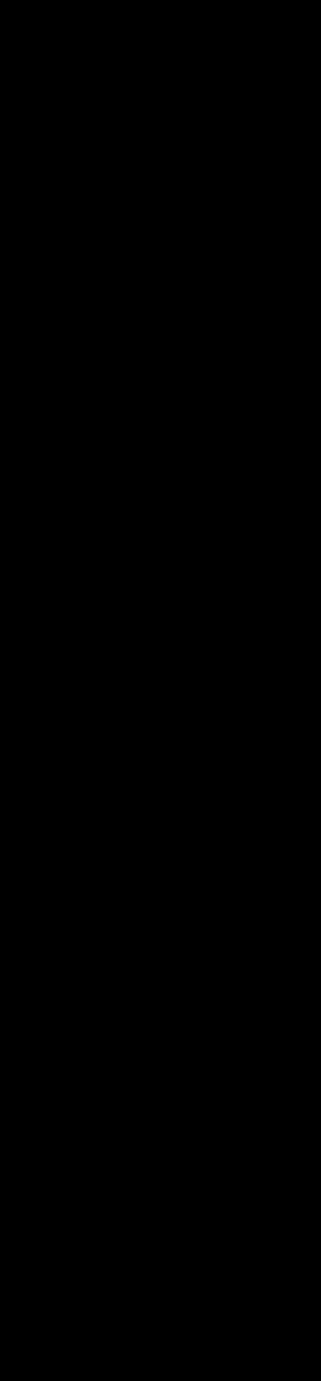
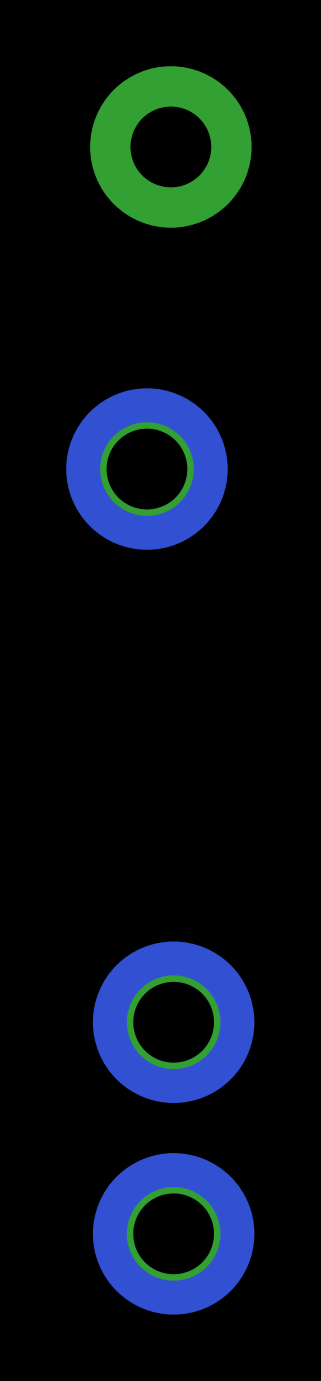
part: none -> (170, 146)
part: none -> (146, 469)
part: none -> (173, 1022)
part: none -> (173, 1233)

